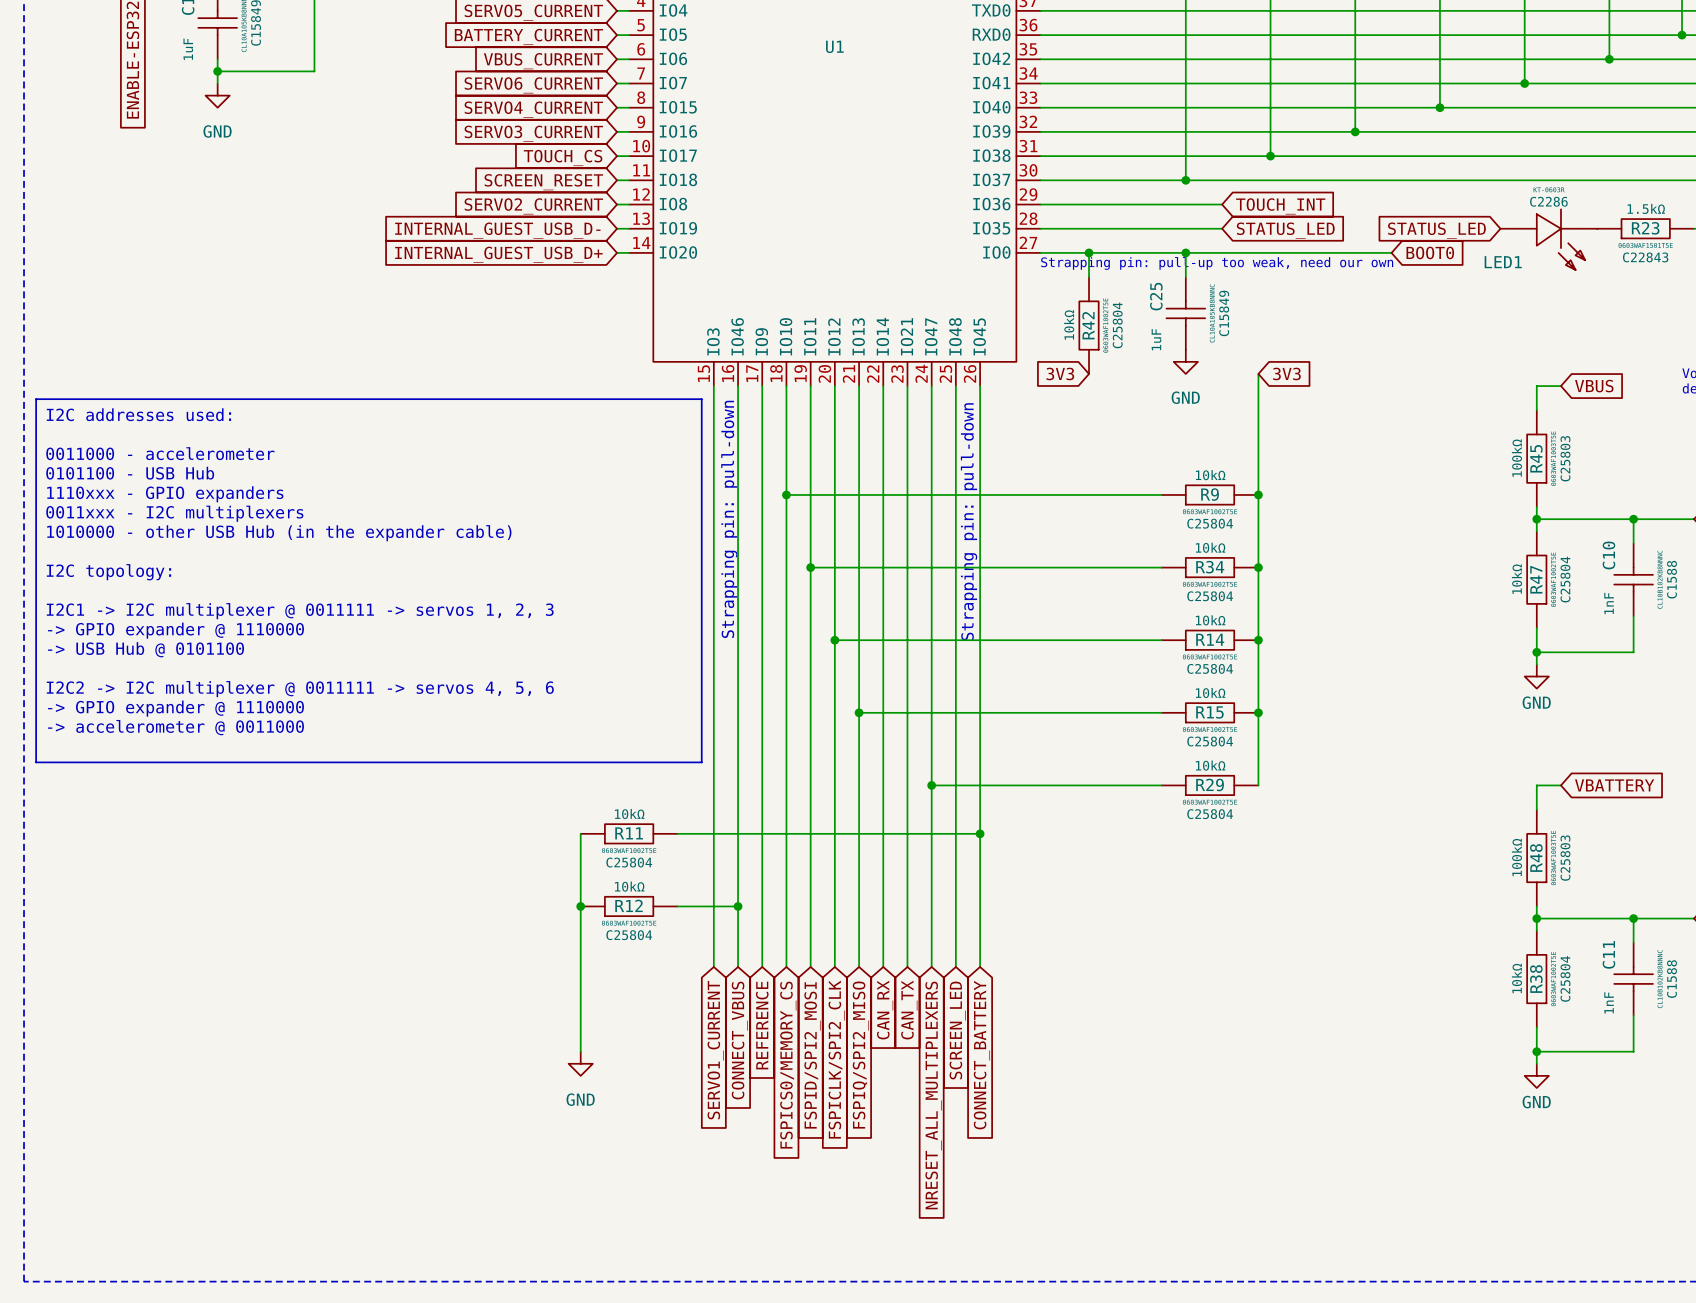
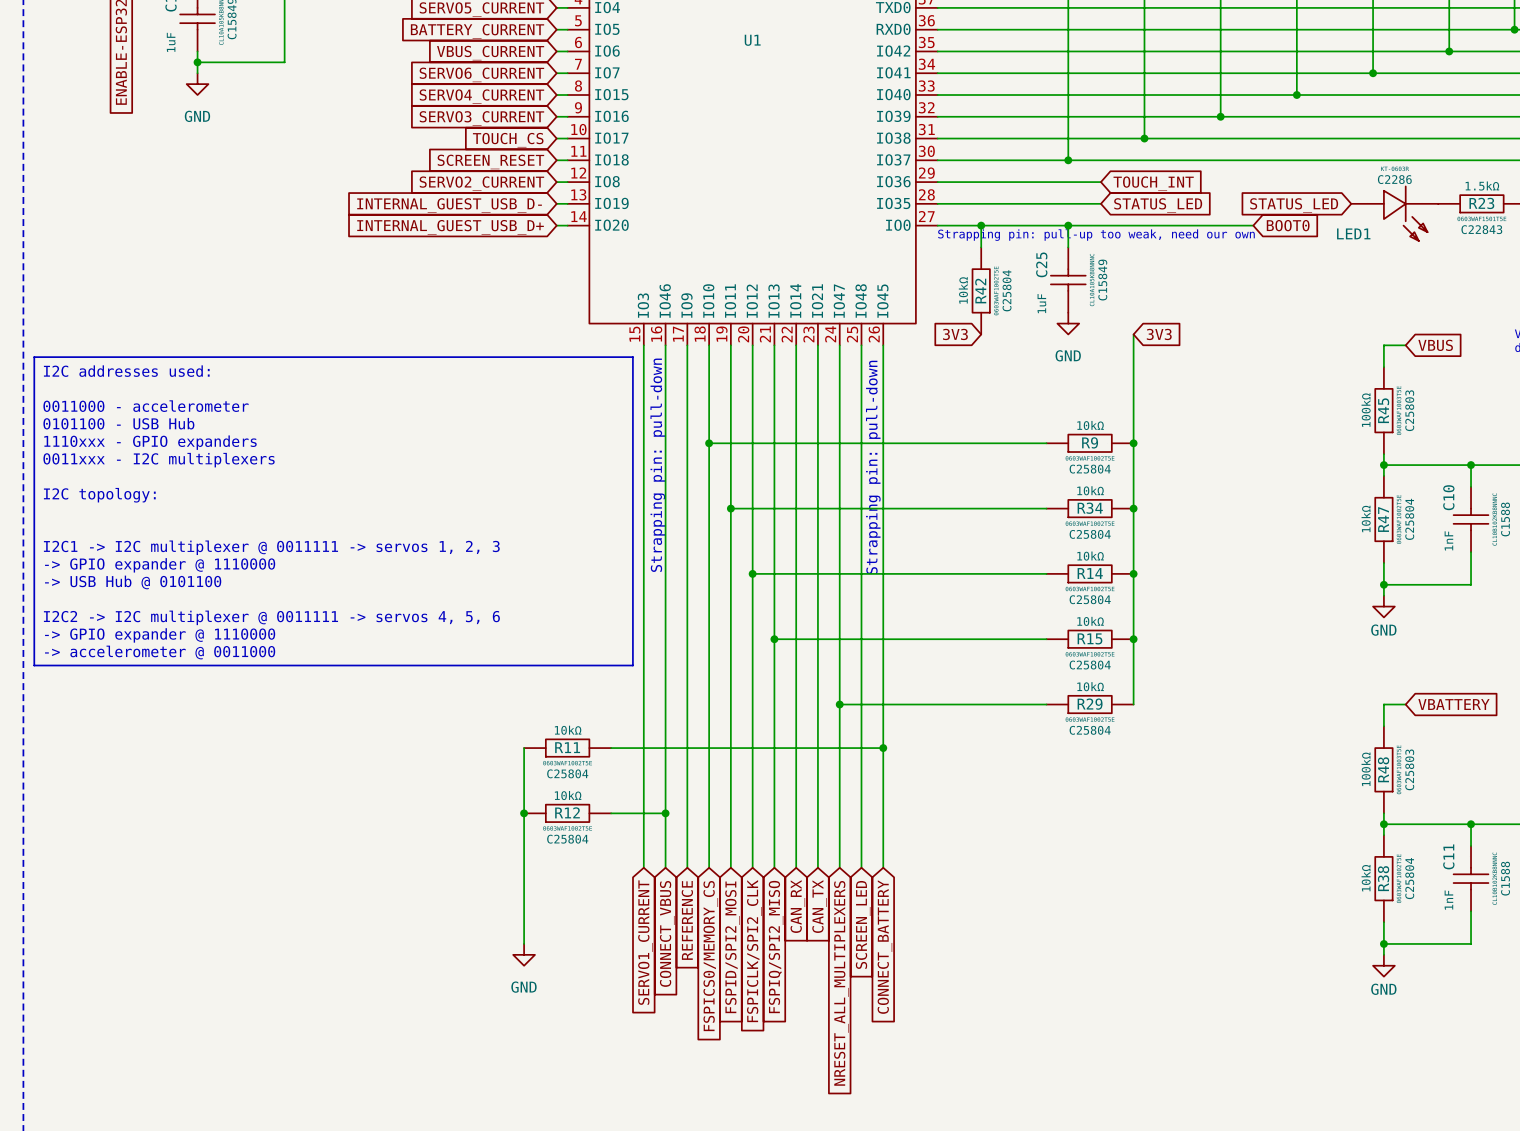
text: 1010000 - other USB Hub (in the expander cable) (279, 533) -> none
text position: I2C topology: (108, 572) -> I2C topology: (99, 495)
line: (36, 742) (36, 762) (701, 762) (701, 742) -> (34, 665) (632, 665)

